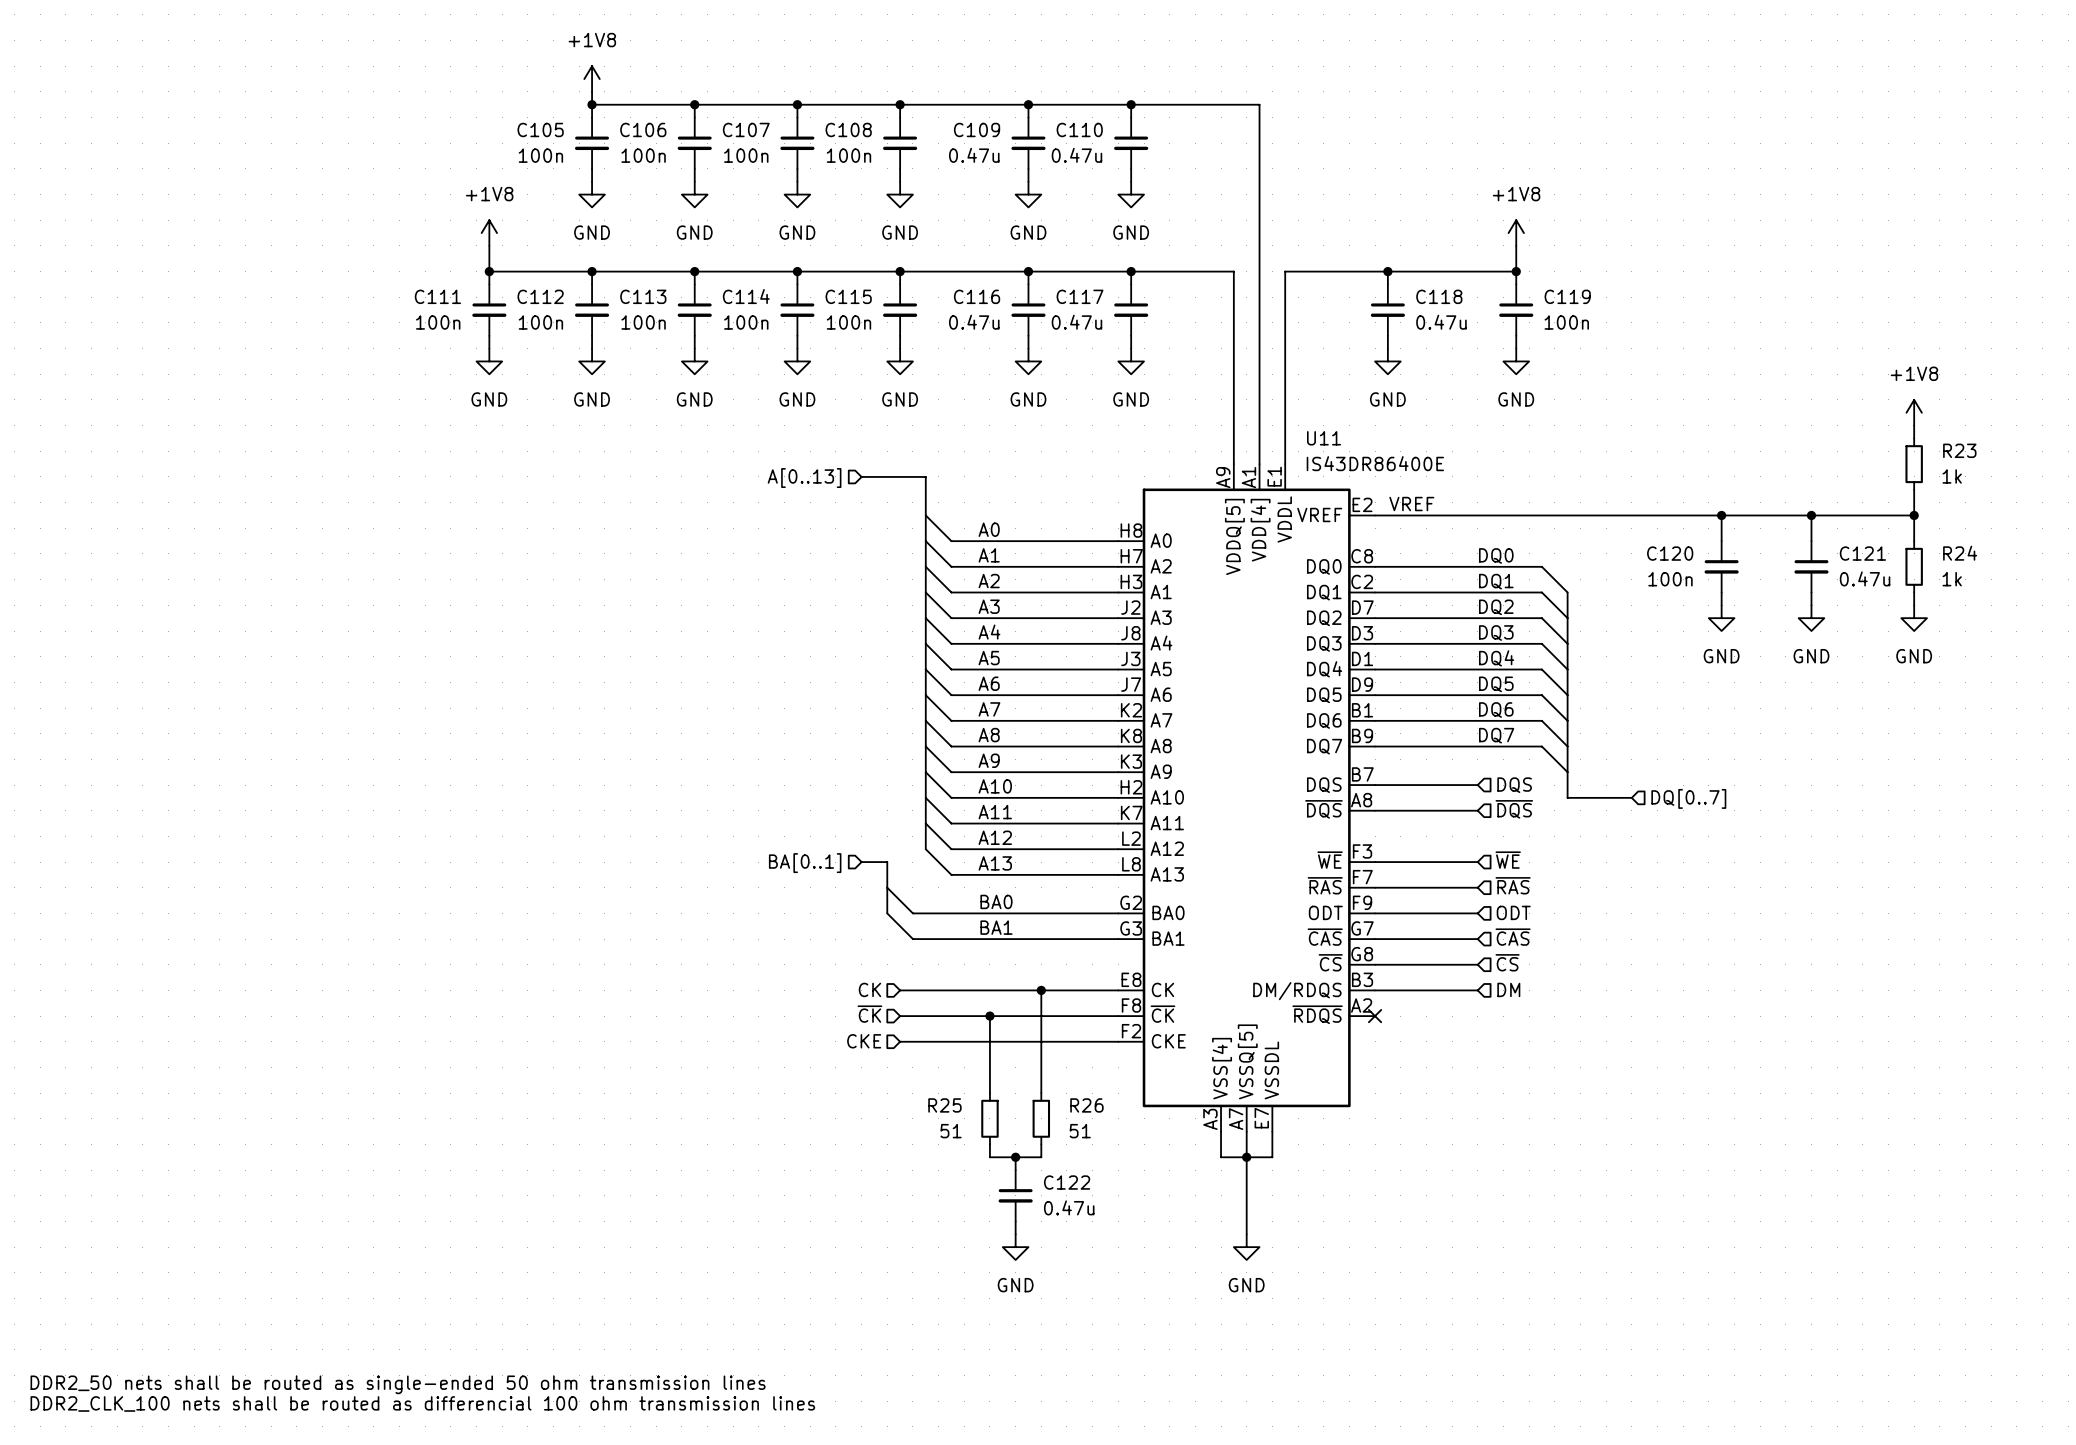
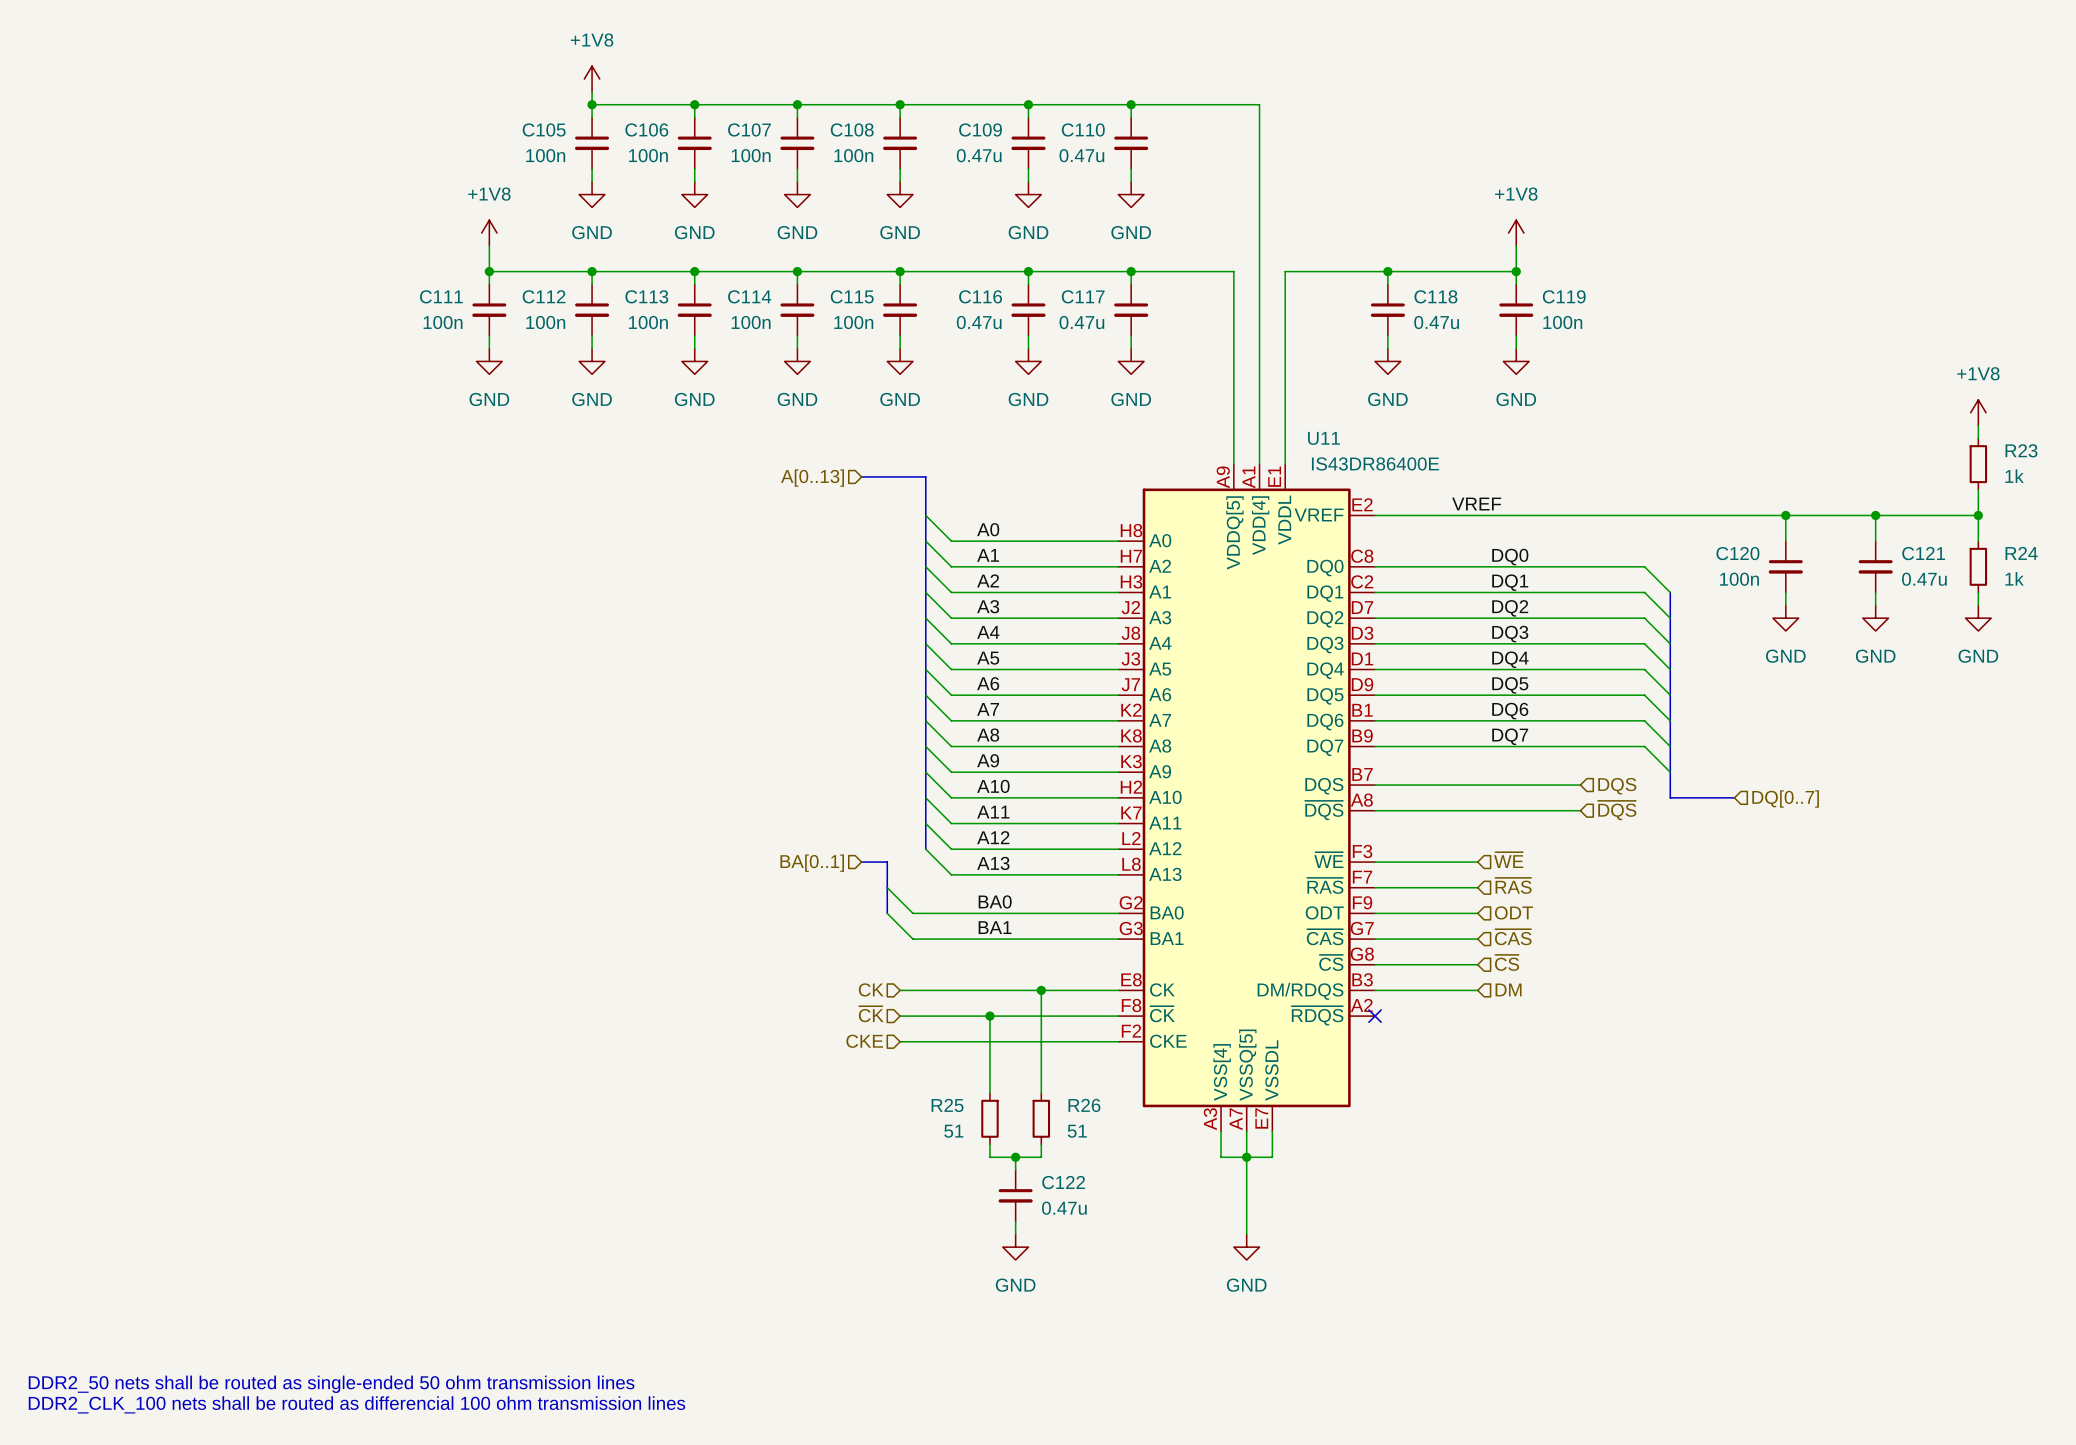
power symbol position: +1V8 (1914, 412) -> +1V8 (1978, 412)
wire: (1914, 425) (1914, 438) -> (1978, 425) (1978, 438)
R23 position: (1914, 464) -> (1978, 464)
wire: (1914, 489) (1914, 541) -> (1978, 489) (1978, 541)
label position: VREF (1411, 504) -> VREF (1476, 504)
wire: (1721, 515) (1721, 541) -> (1785, 515) (1785, 541)
junction: (1721, 515) -> none
wire: (1811, 515) (1811, 541) -> (1875, 515) (1875, 541)
junction position: (1811, 515) -> (1785, 515)
junction: none -> (1875, 515)
wire: none -> (1914, 515) (1978, 515)
junction: (1914, 515) -> none
junction: none -> (1978, 515)
label position: DQ0 (1496, 555) -> DQ0 (1510, 557)
wire: (1541, 566) (1567, 592) -> (1541, 566) (1644, 566) (1670, 592)
C120 position: (1721, 566) -> (1785, 566)
C121 position: (1811, 566) -> (1875, 566)
R24 position: (1914, 566) -> (1978, 566)
label position: DQ1 (1496, 581) -> DQ1 (1510, 582)
wire: (1541, 592) (1567, 618) -> (1541, 592) (1644, 592) (1670, 618)
bus: (1567, 592) (1567, 797) (1631, 797) -> (1670, 592) (1670, 797) (1734, 797)
wire: (1721, 592) (1721, 605) -> (1785, 592) (1785, 605)
wire: (1811, 592) (1811, 605) -> (1875, 592) (1875, 605)
wire: (1914, 592) (1914, 605) -> (1978, 592) (1978, 605)
label position: DQ2 (1496, 607) -> DQ2 (1510, 608)
wire: (1541, 618) (1567, 643) -> (1541, 618) (1644, 618) (1670, 643)
power symbol: GND (1721, 618) -> none
power symbol position: GND (1811, 618) -> GND (1785, 618)
power symbol: none -> GND (1875, 618)
power symbol: GND (1914, 618) -> none
power symbol: none -> GND (1978, 618)
label position: DQ3 (1496, 633) -> DQ3 (1510, 634)
wire: (1541, 643) (1567, 669) -> (1541, 643) (1644, 643) (1670, 669)
label position: DQ4 (1496, 658) -> DQ4 (1510, 659)
wire: (1541, 669) (1567, 695) -> (1541, 669) (1644, 669) (1670, 695)
label position: DQ5 (1496, 684) -> DQ5 (1510, 685)
wire: (1541, 695) (1567, 720) -> (1541, 695) (1644, 695) (1670, 720)
label position: DQ6 (1496, 710) -> DQ6 (1510, 711)
wire: (1541, 720) (1567, 746) -> (1541, 720) (1644, 720) (1670, 746)
label position: DQ7 (1496, 735) -> DQ7 (1510, 736)
wire: (1541, 746) (1567, 772) -> (1541, 746) (1644, 746) (1670, 772)
wire: none -> (1477, 785) (1580, 785)
hierarchical label position: DQS (1514, 785) -> DQS (1617, 786)
hierarchical label position: DQ[0..7] (1688, 798) -> DQ[0..7] (1785, 798)
hierarchical label position: ~{DQS} (1514, 809) -> ~{DQS} (1617, 810)
wire: none -> (1477, 810) (1580, 810)

